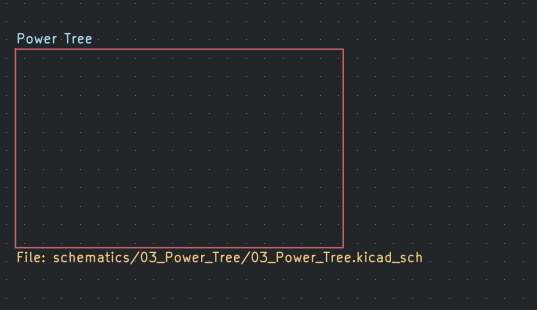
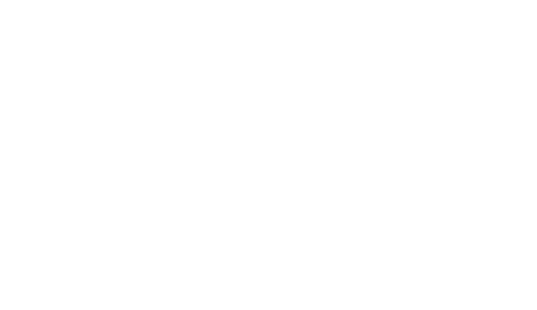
sheet Power Tree: File: schematics/03_Power_Tree/03_Power_Tree.kicad_sch (179, 148) -> none

